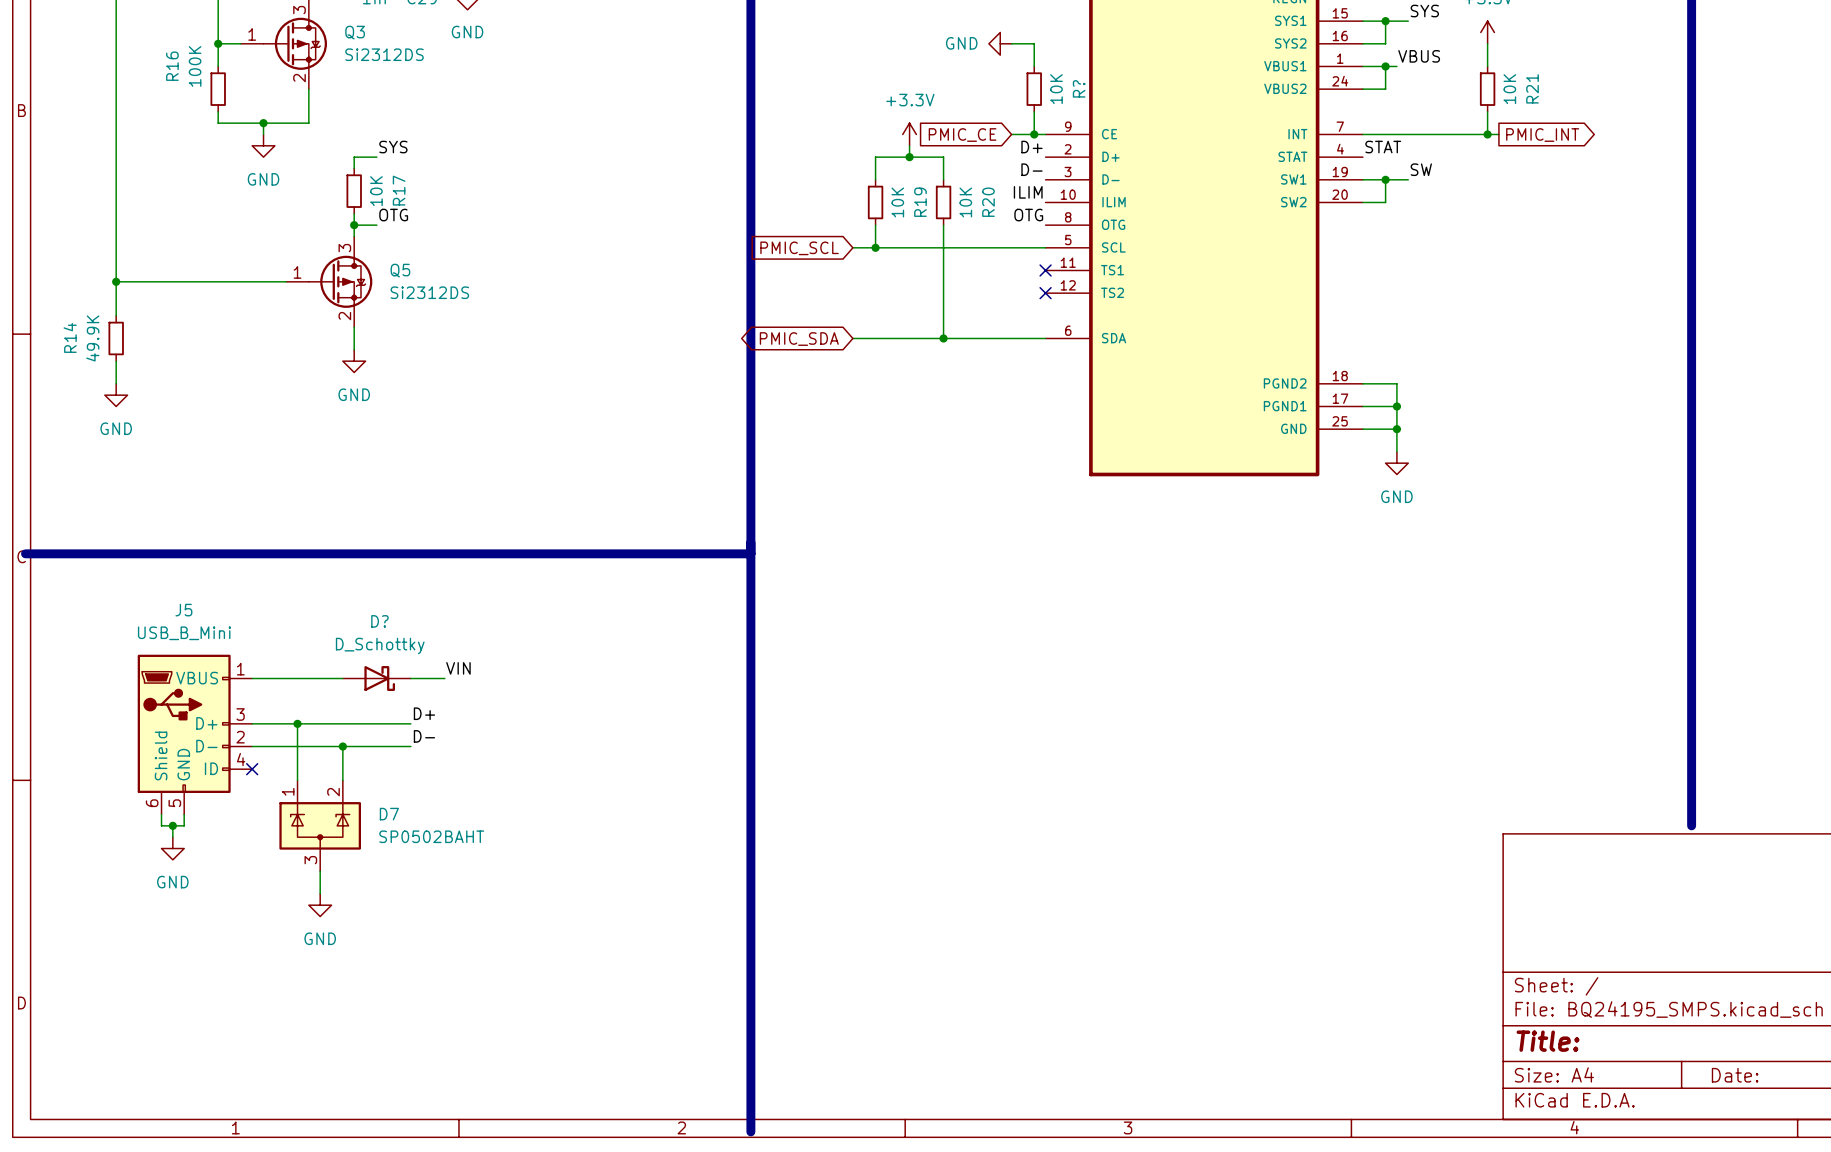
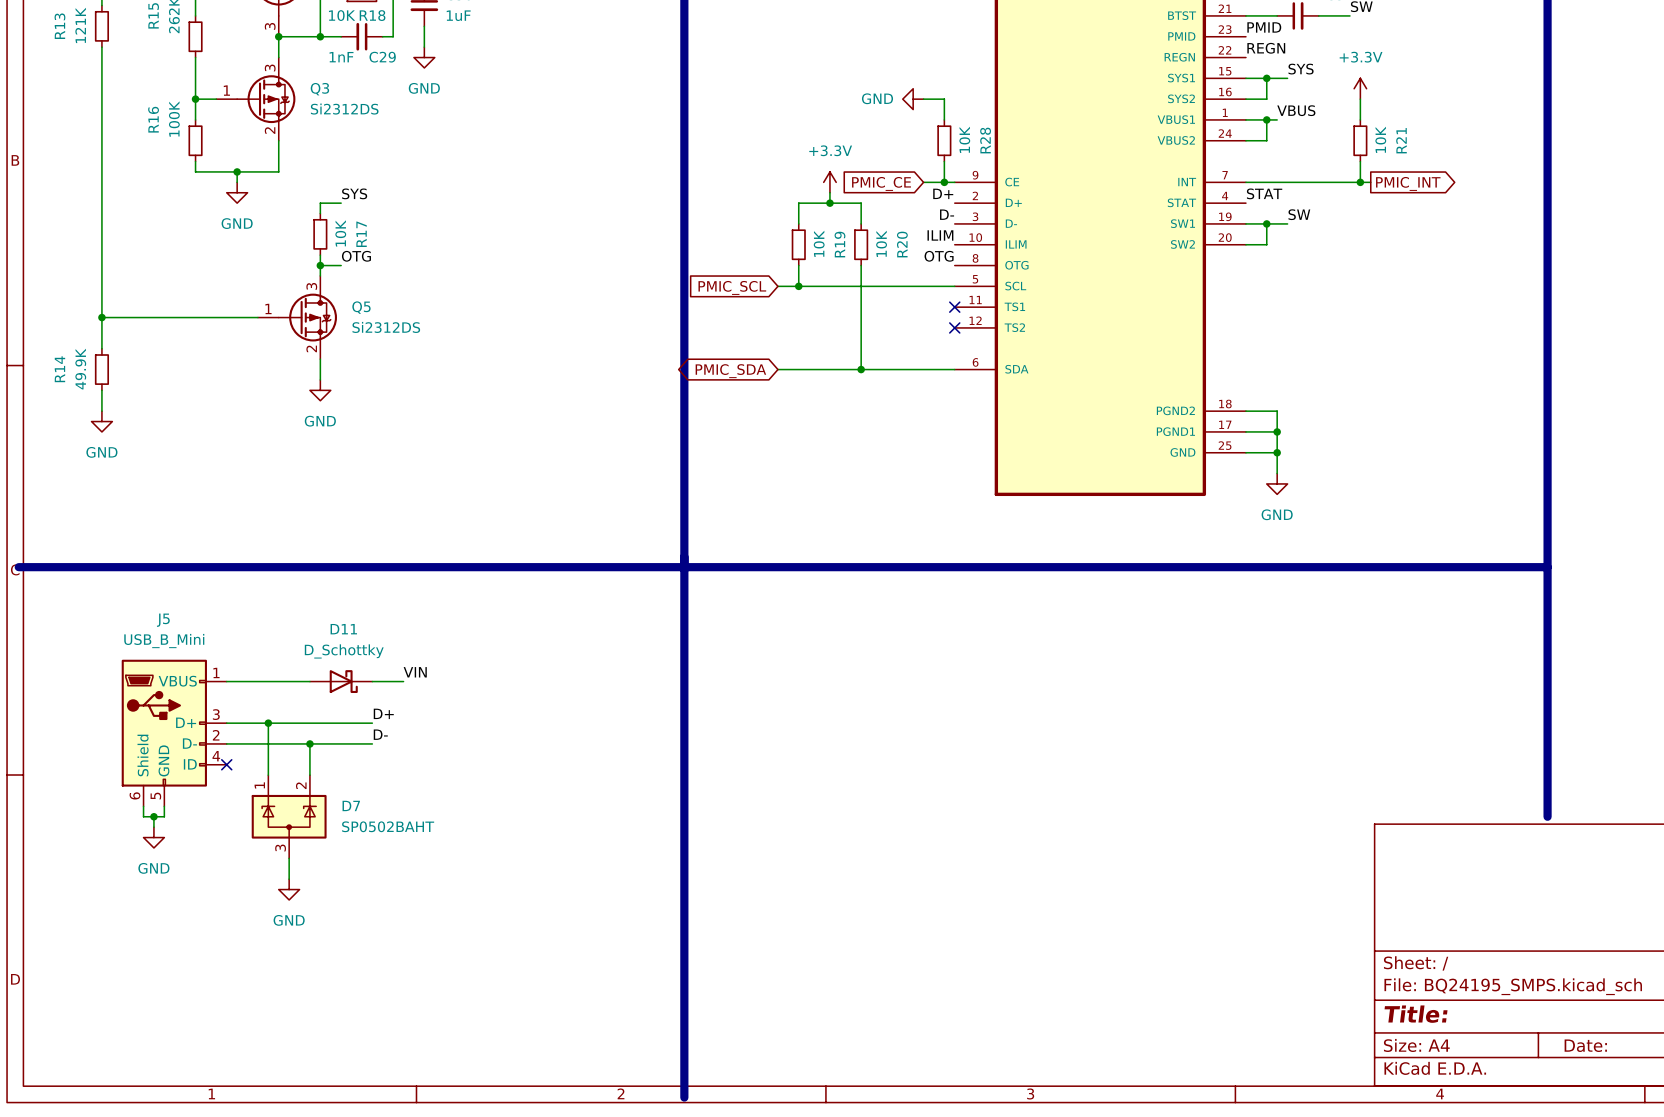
R? name: R? (1079, 88) -> R28 (985, 140)
line: none -> (684, 567) (1547, 567) (1547, 577)
D? name: D? (379, 621) -> D11 (343, 629)

